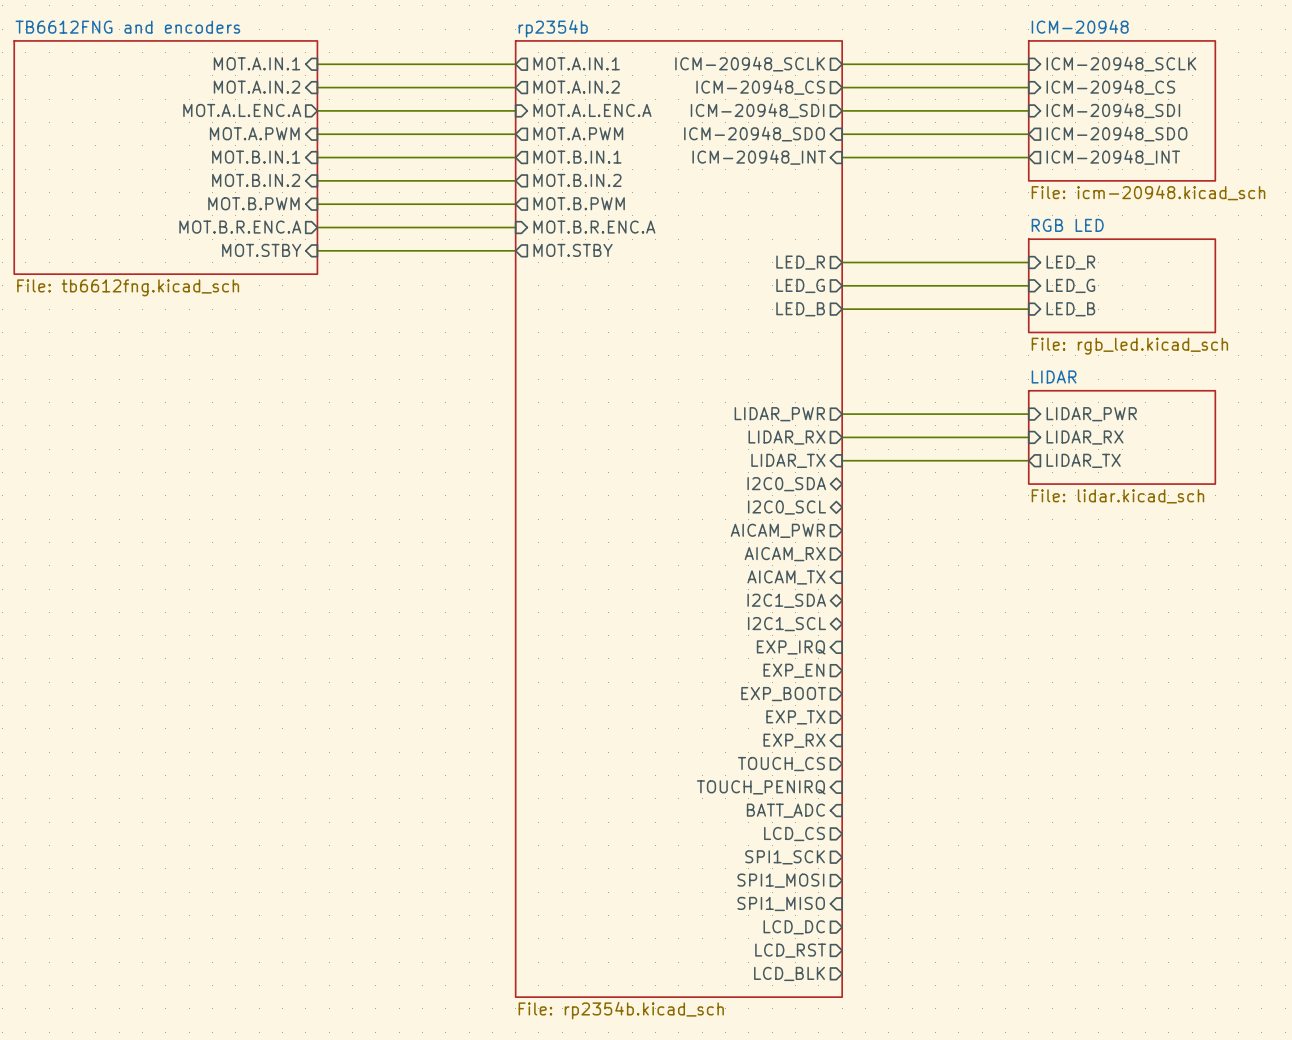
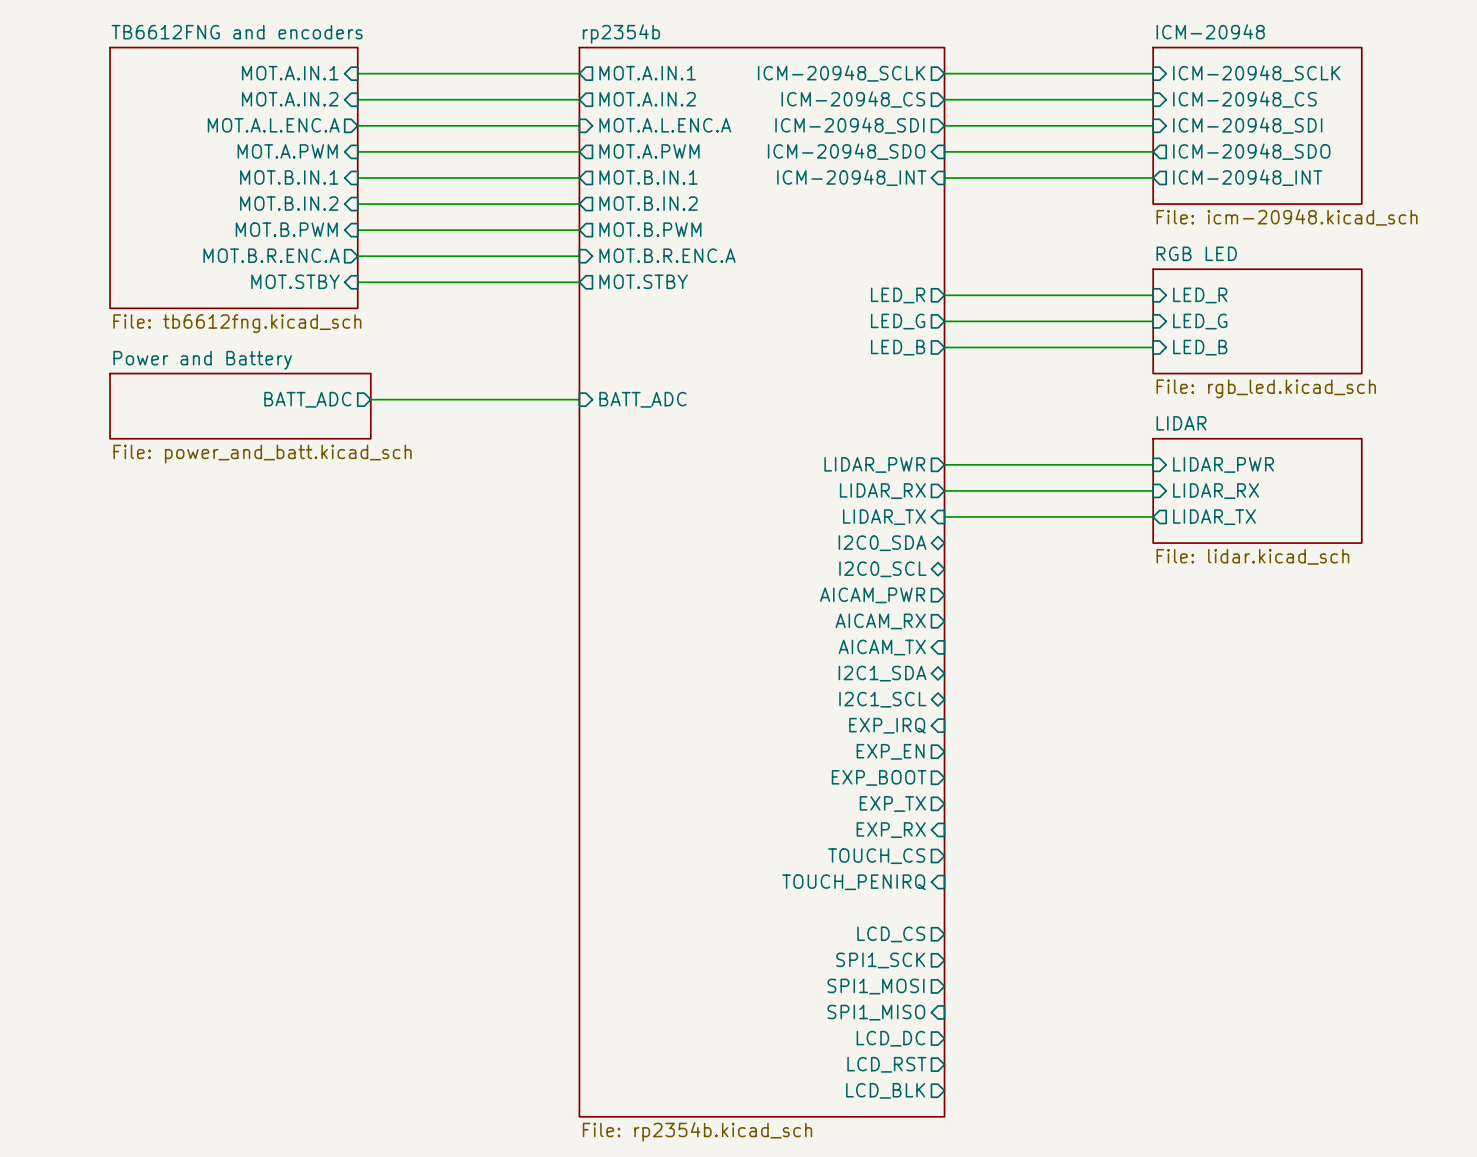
sheet TB6612FNG and encoders name position: TB6612FNG and encoders (127, 27) -> TB6612FNG and encoders (237, 32)
sheet TB6612FNG and encoders shape: [13, 40, 319, 275] -> [109, 46, 359, 310]
sheet TB6612FNG and encoders value position: File: tb6612fng.kicad_sch (128, 287) -> File: tb6612fng.kicad_sch (237, 323)
sheet pin: none -> BATT_ADC (307, 399)
wire: none -> (370, 399) (579, 399)
sheet pin: none -> BATT_ADC (642, 399)
sheet Power and Battery: none -> File: power_and_batt.kicad_sch (240, 406)
sheet pin: BATT_ADC (785, 810) -> none

